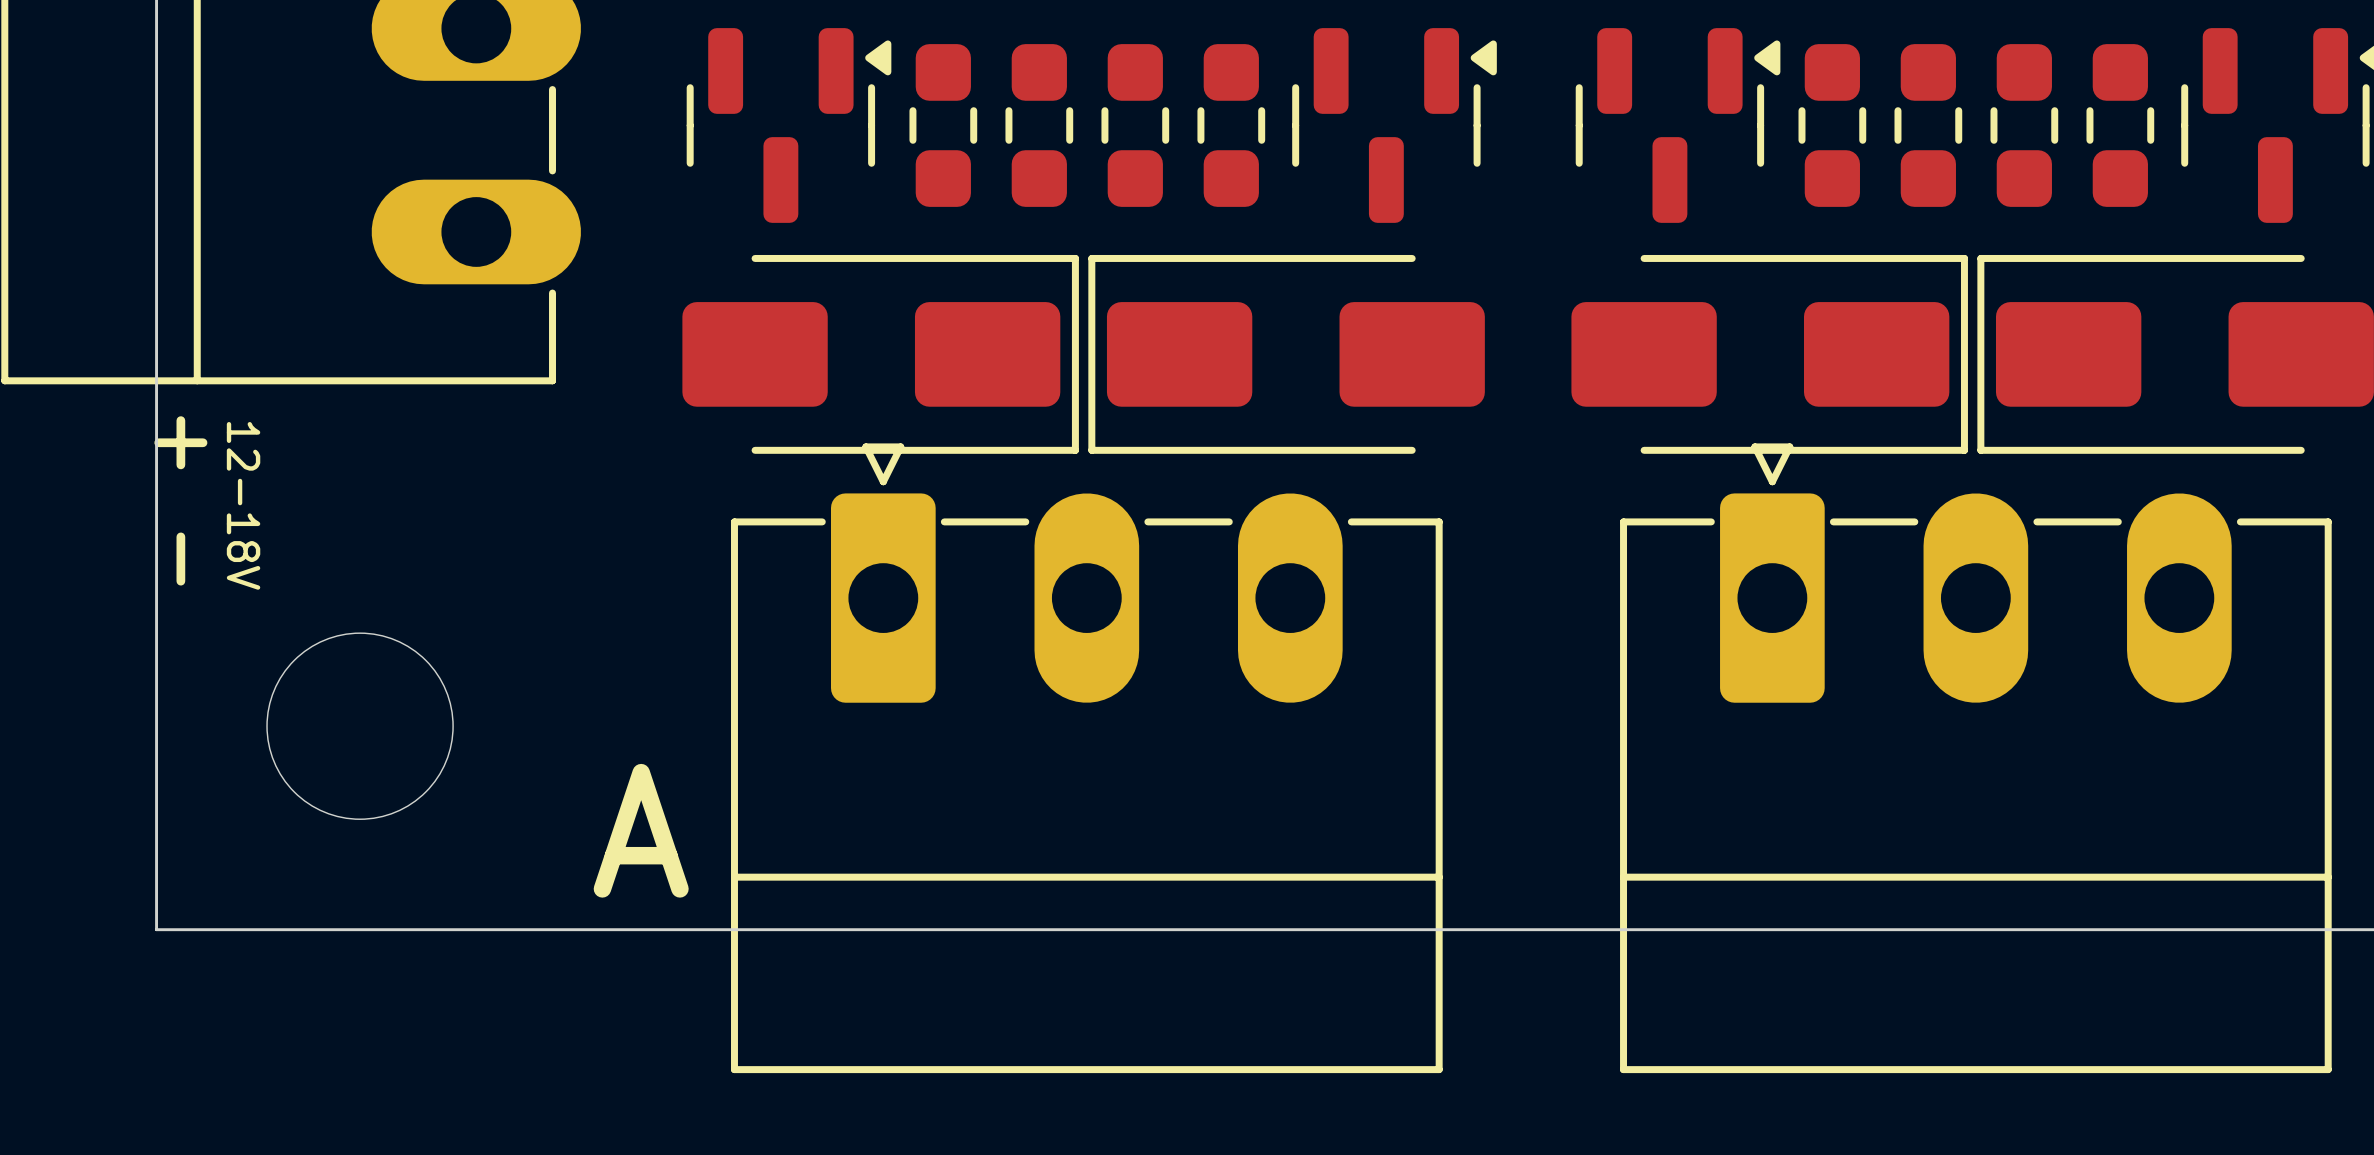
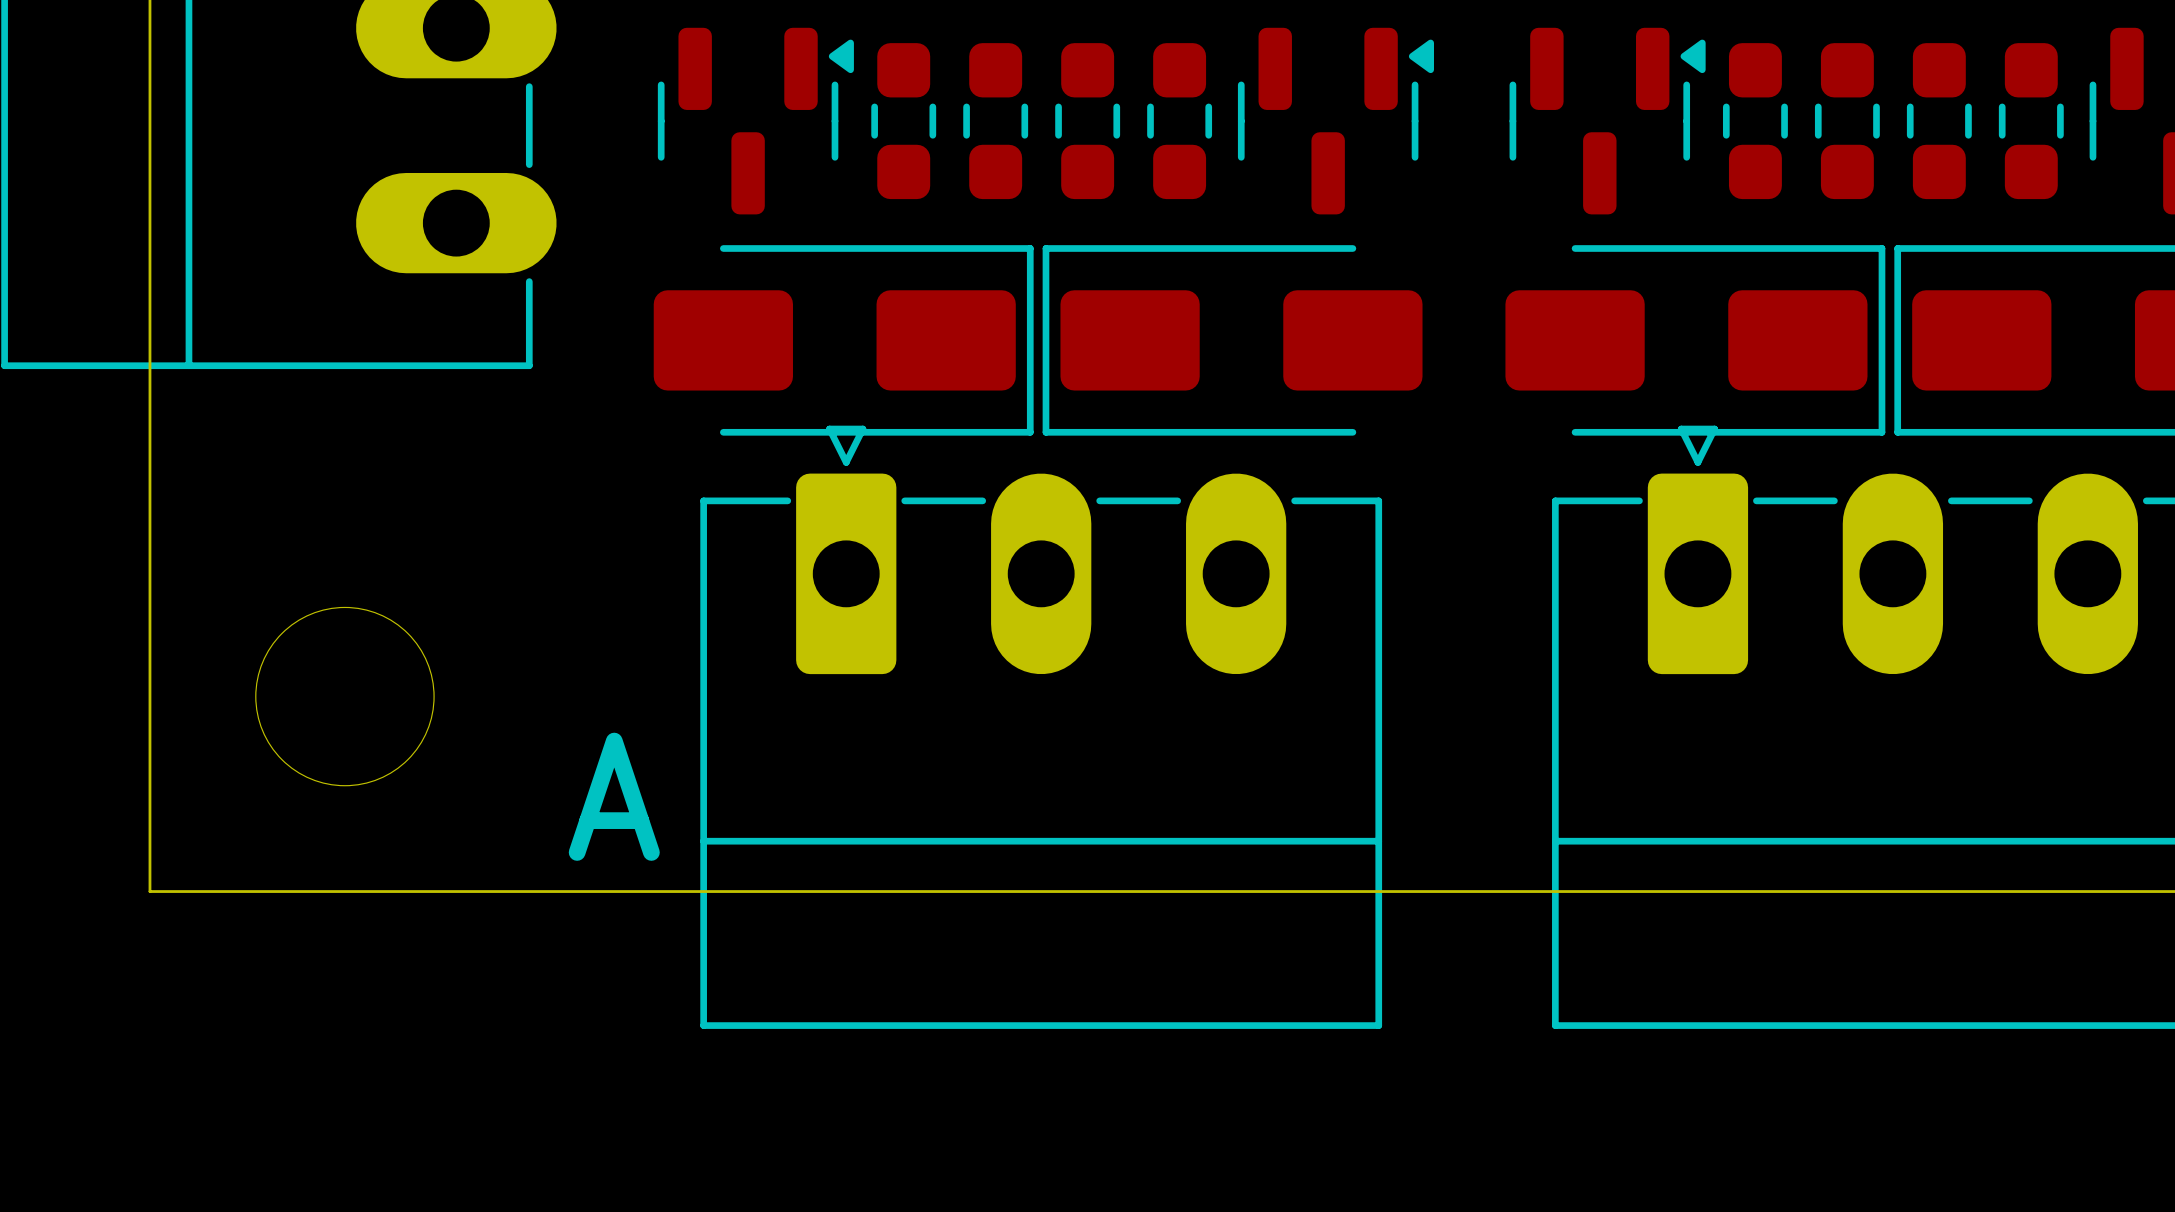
text: + - (180, 500) -> none
text: 12-18V (243, 505) -> none

